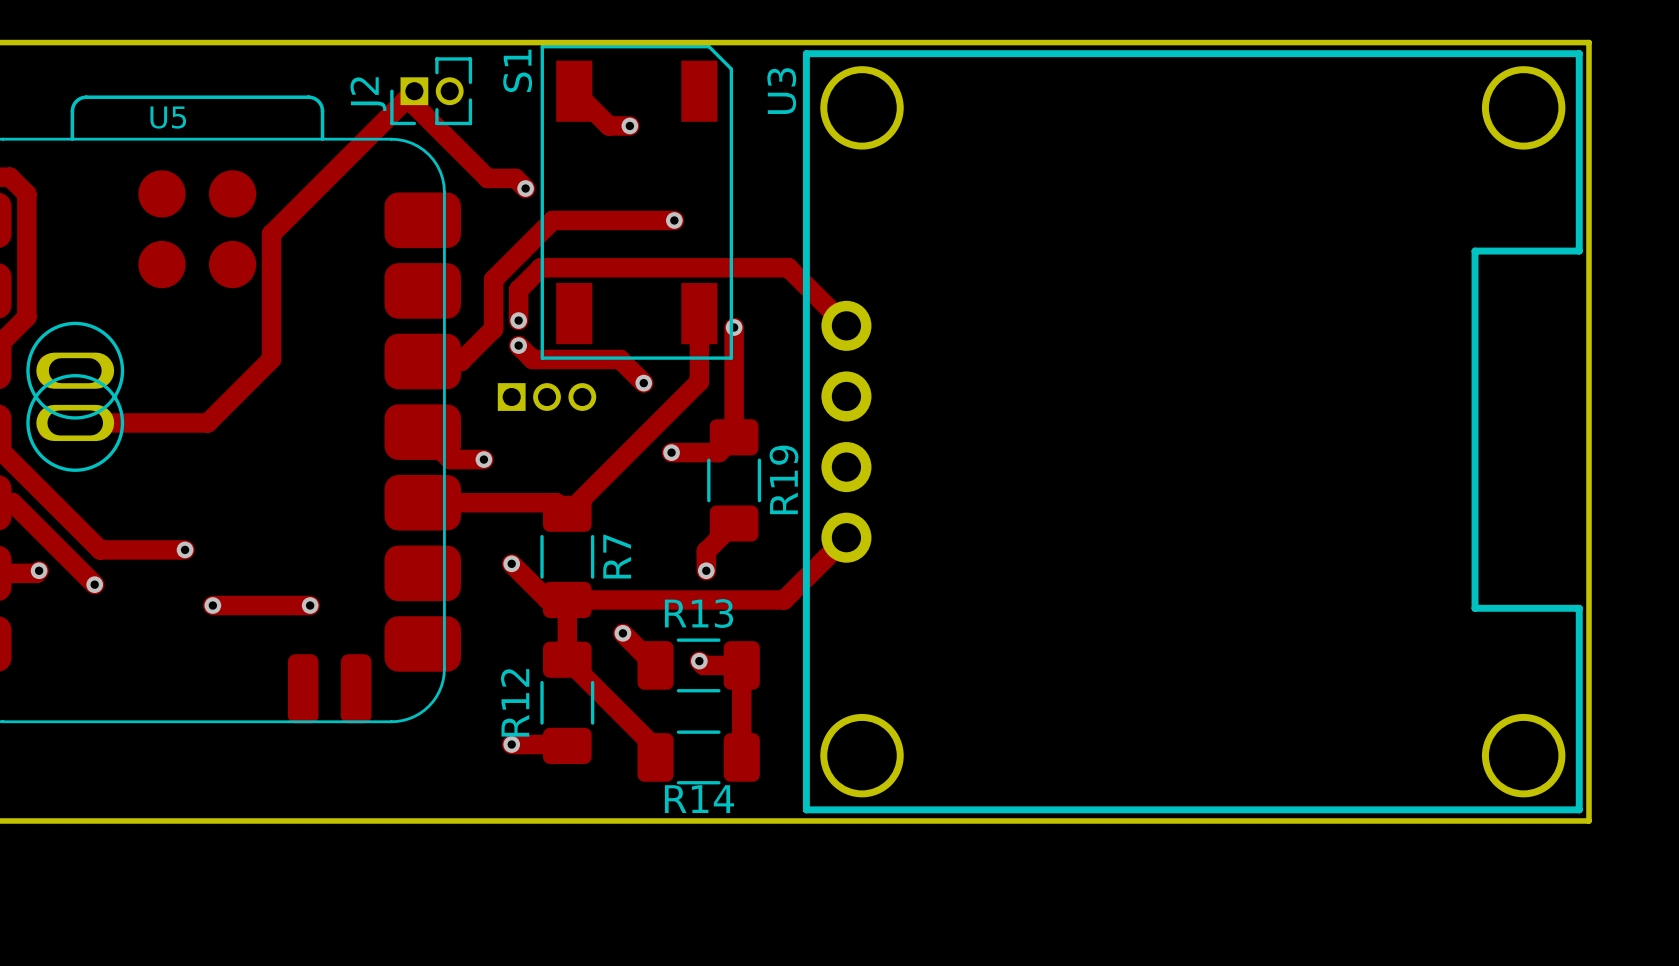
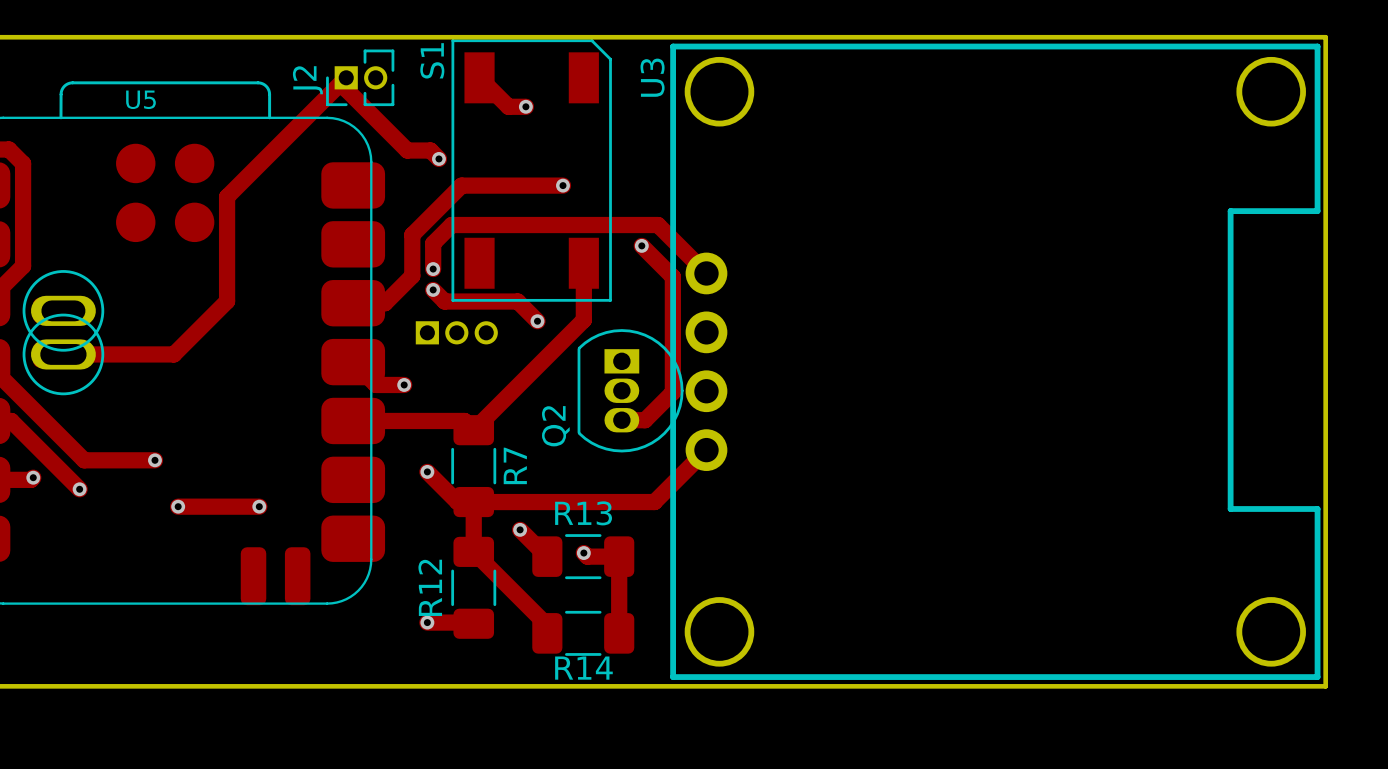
track: none -> (641, 245) (672, 276) (672, 392) (645, 420) (621, 420)
track: (734, 327) (734, 437) (718, 452) (671, 452) -> none
via position: (734, 327) -> (641, 245)
via: (671, 452) -> none
Q2: none -> (630, 390)
R19: (734, 480) -> none
track: (734, 523) (706, 551) (706, 570) -> none
via: (706, 570) -> none

